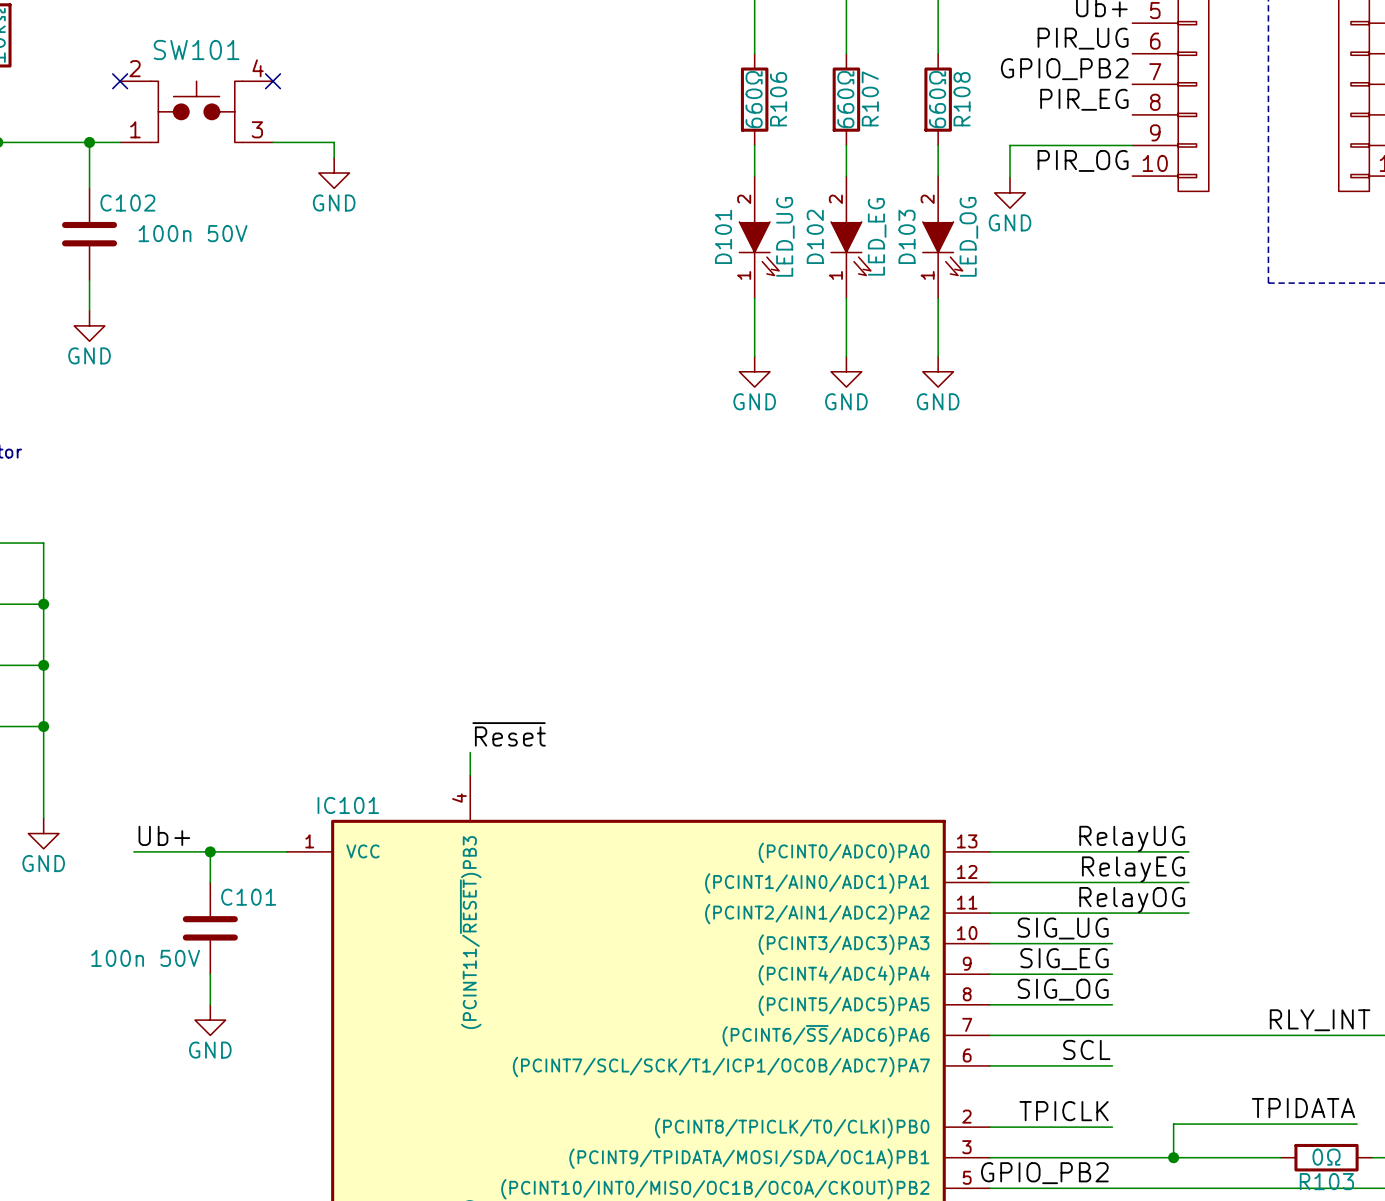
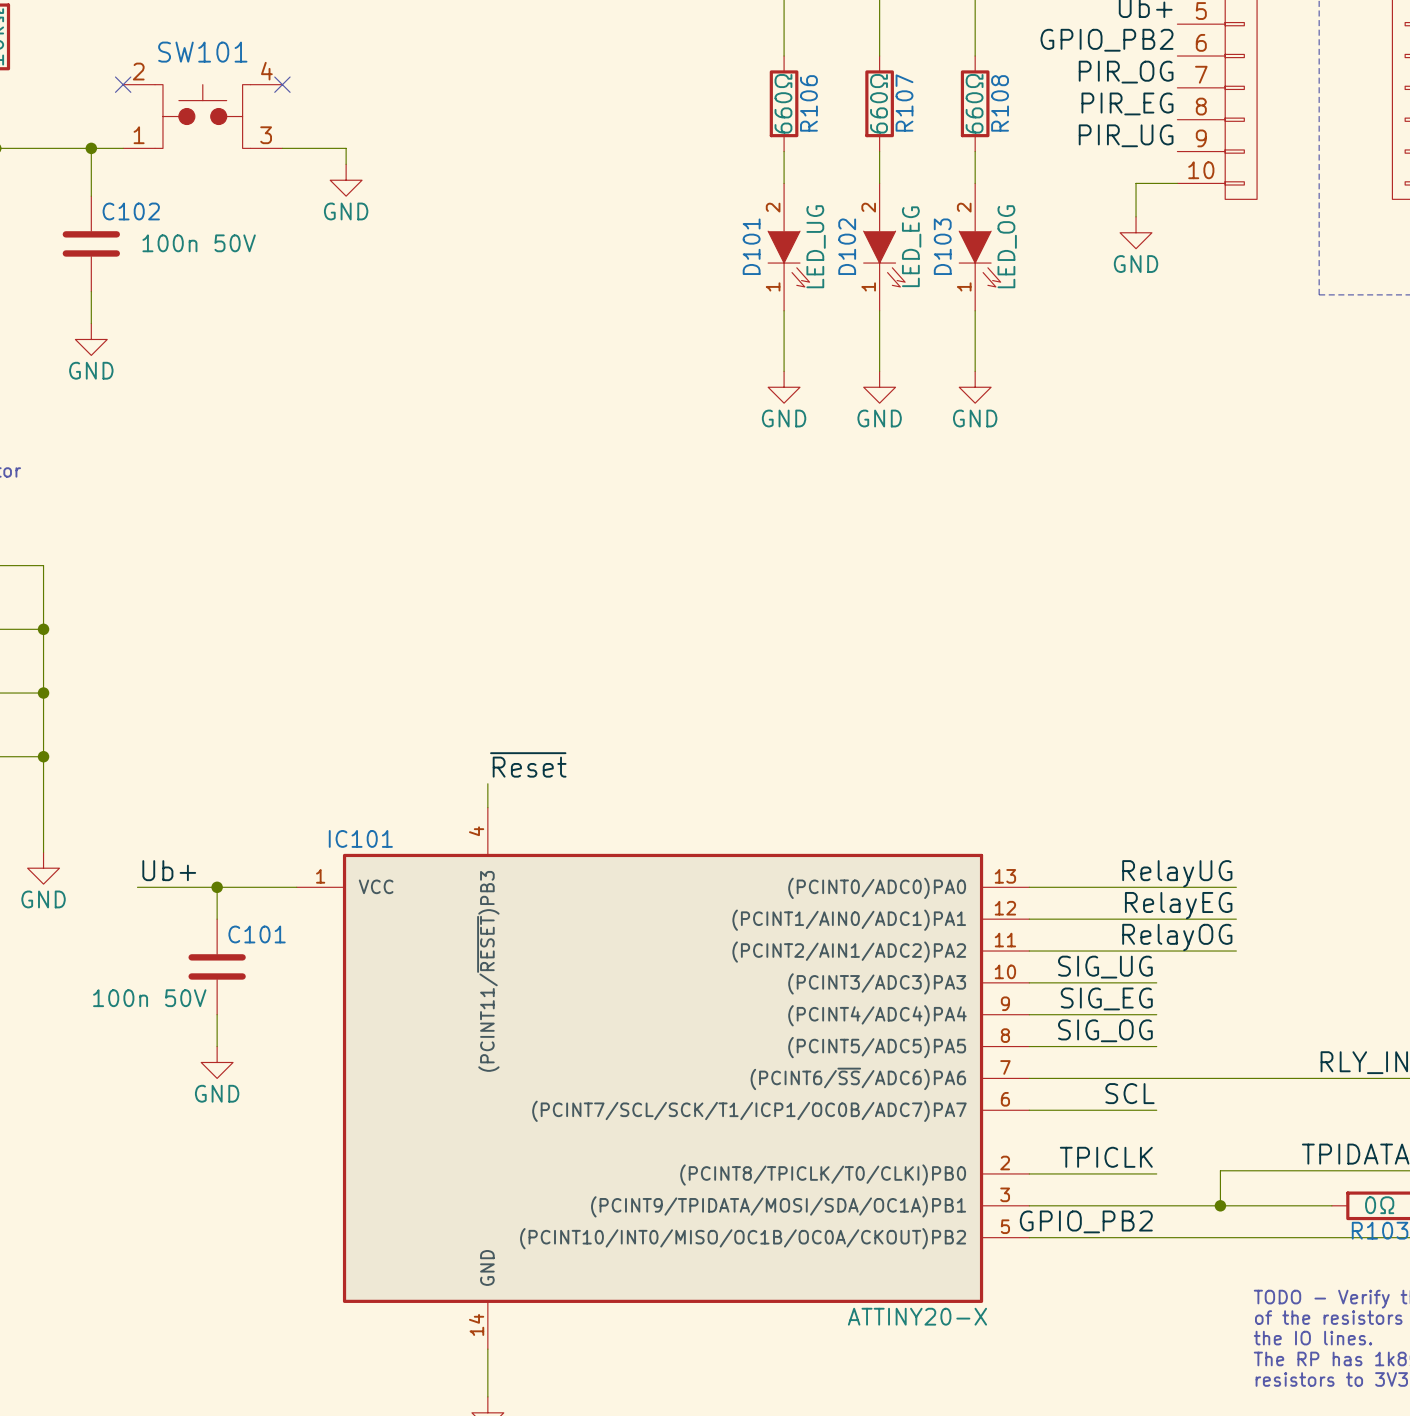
label: PIR_UG (1083, 38) -> GPIO_PB2 (1107, 40)
label: GPIO_PB2 (1064, 69) -> PIR_OG (1126, 72)
wire: (1132, 145) (1010, 145) (1010, 177) -> none
label: PIR_OG (1083, 160) -> PIR_UG (1126, 135)
wire: none -> (1177, 183) (1136, 183) (1136, 216)
power symbol position: GND (1010, 192) -> GND (1136, 232)

